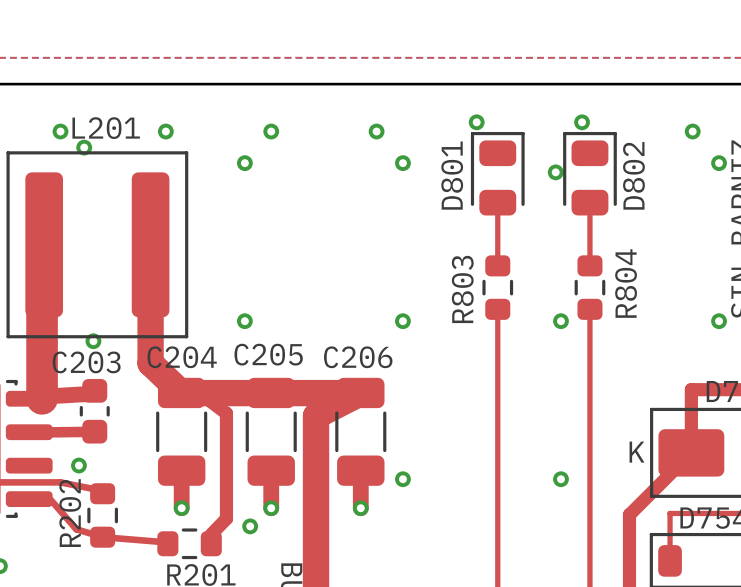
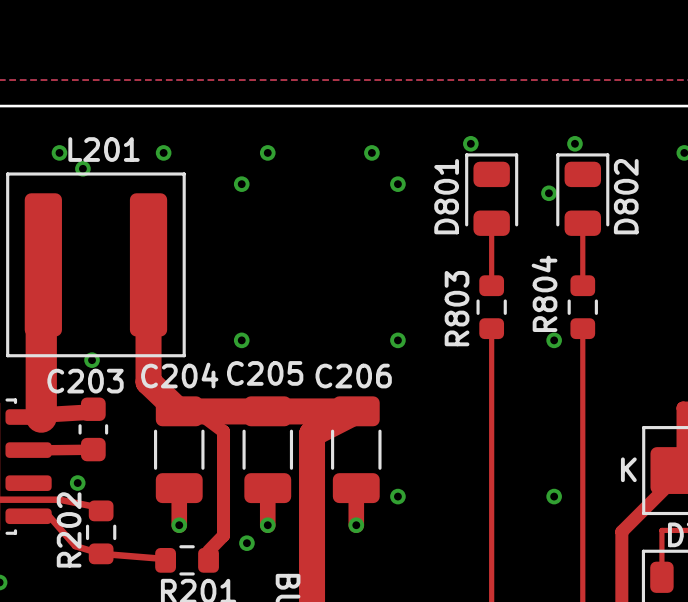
R804 name position: R804 (626, 283) -> R804 (544, 293)

